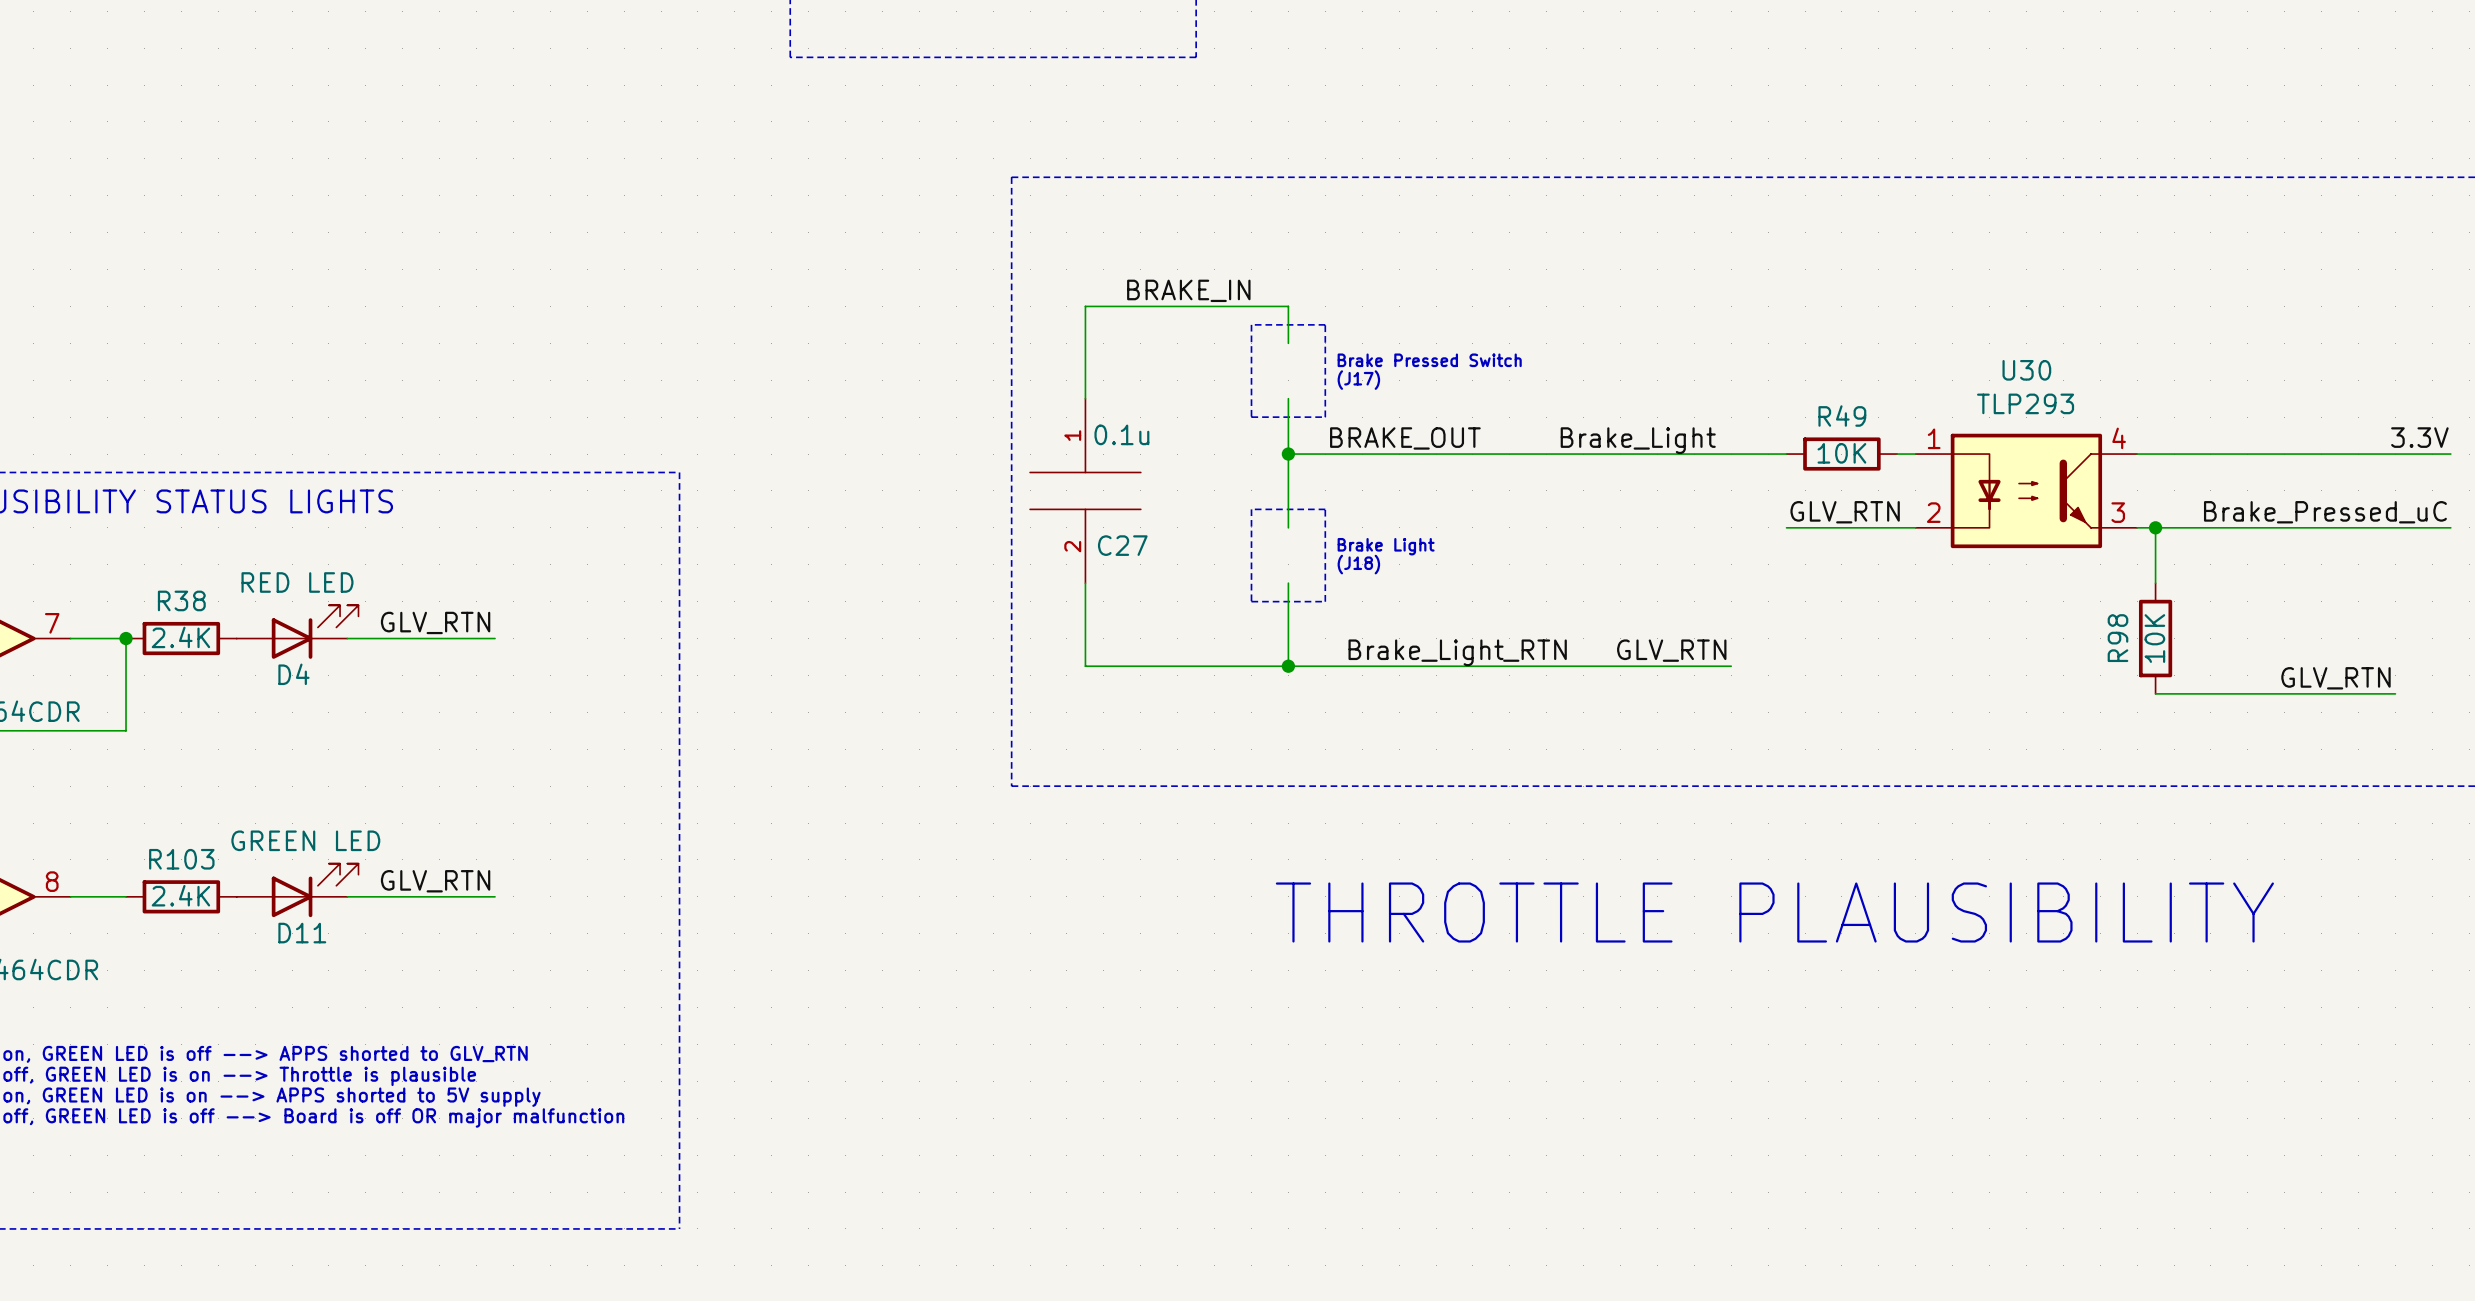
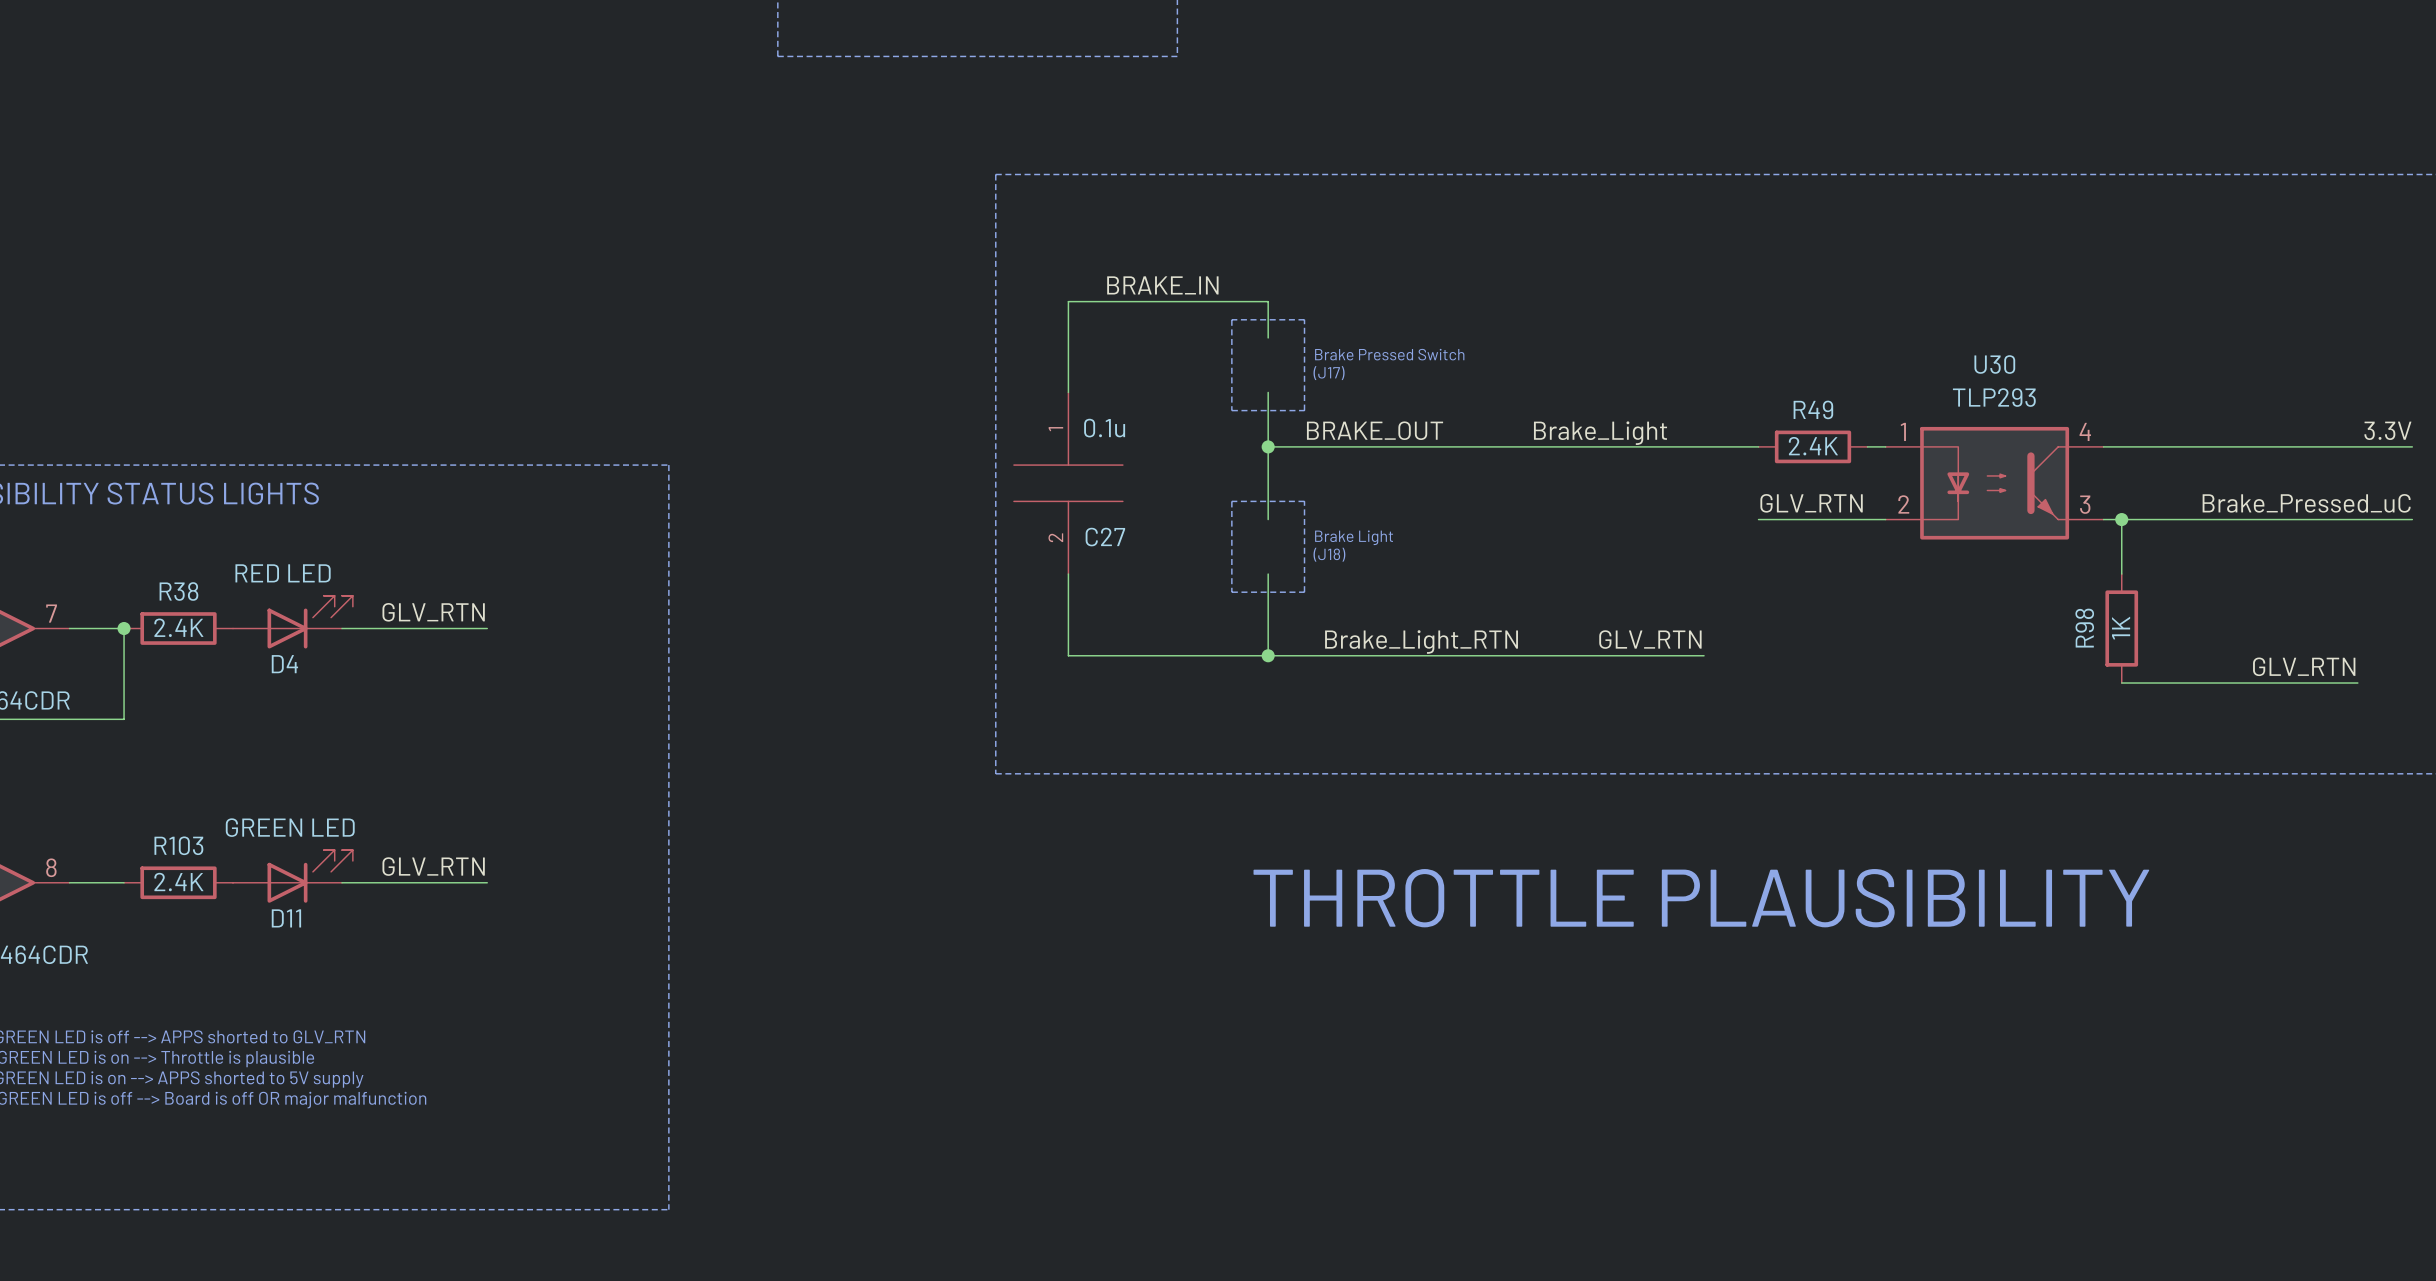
R49 value: 10K (1841, 453) -> 2.4K (1813, 446)
R98 value: 10K (2154, 638) -> 1K (2121, 628)

